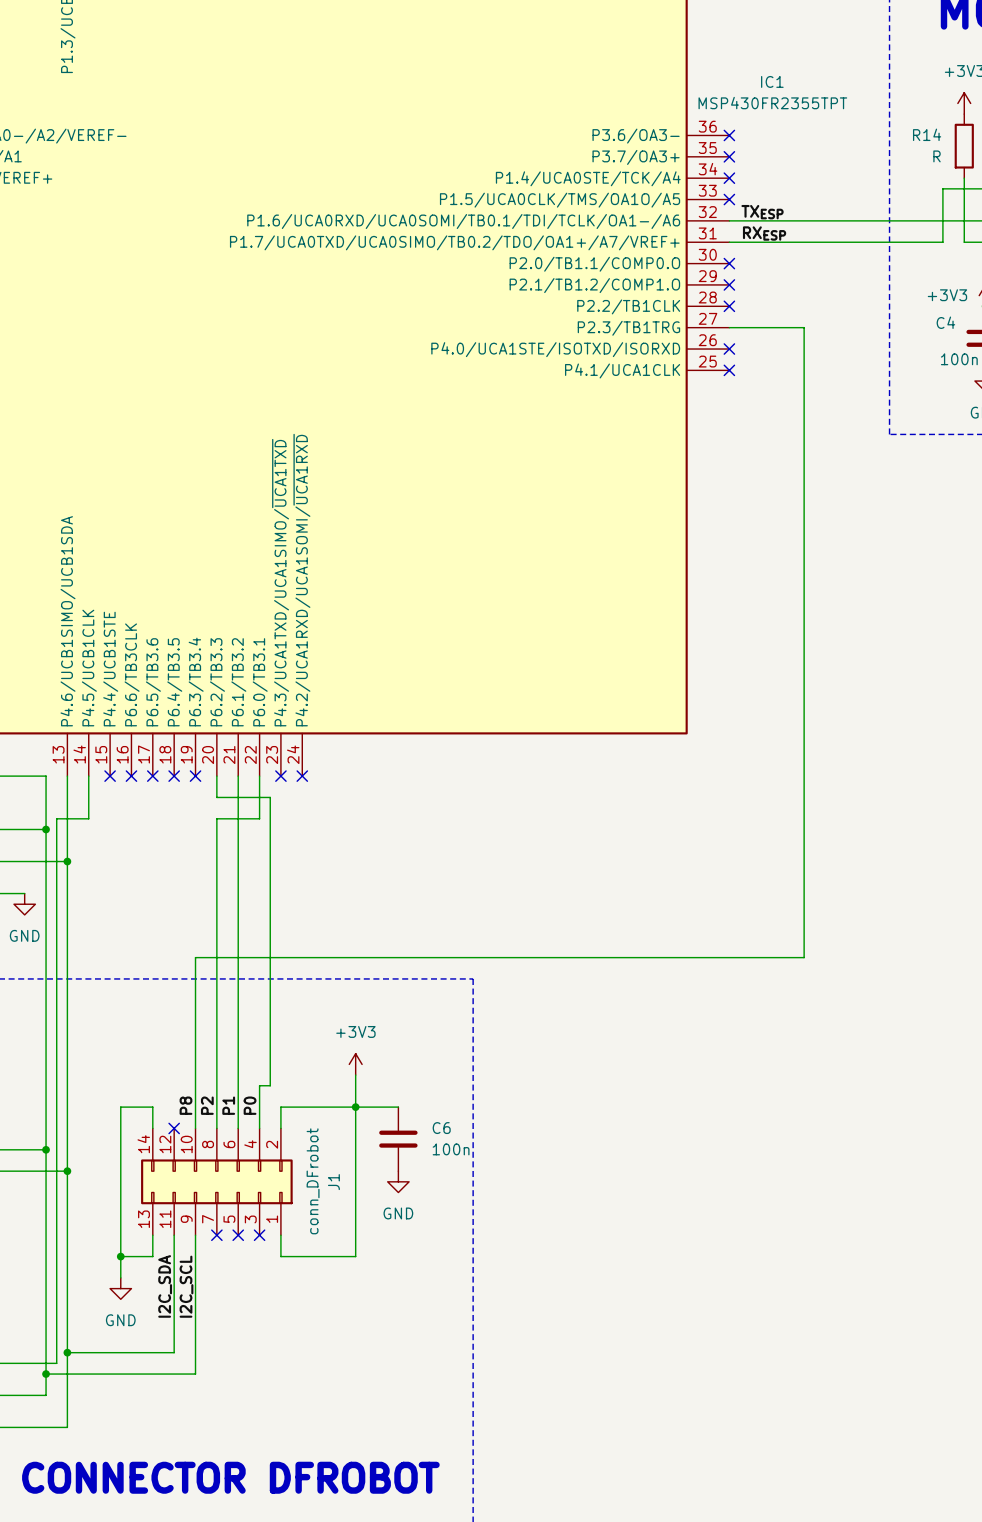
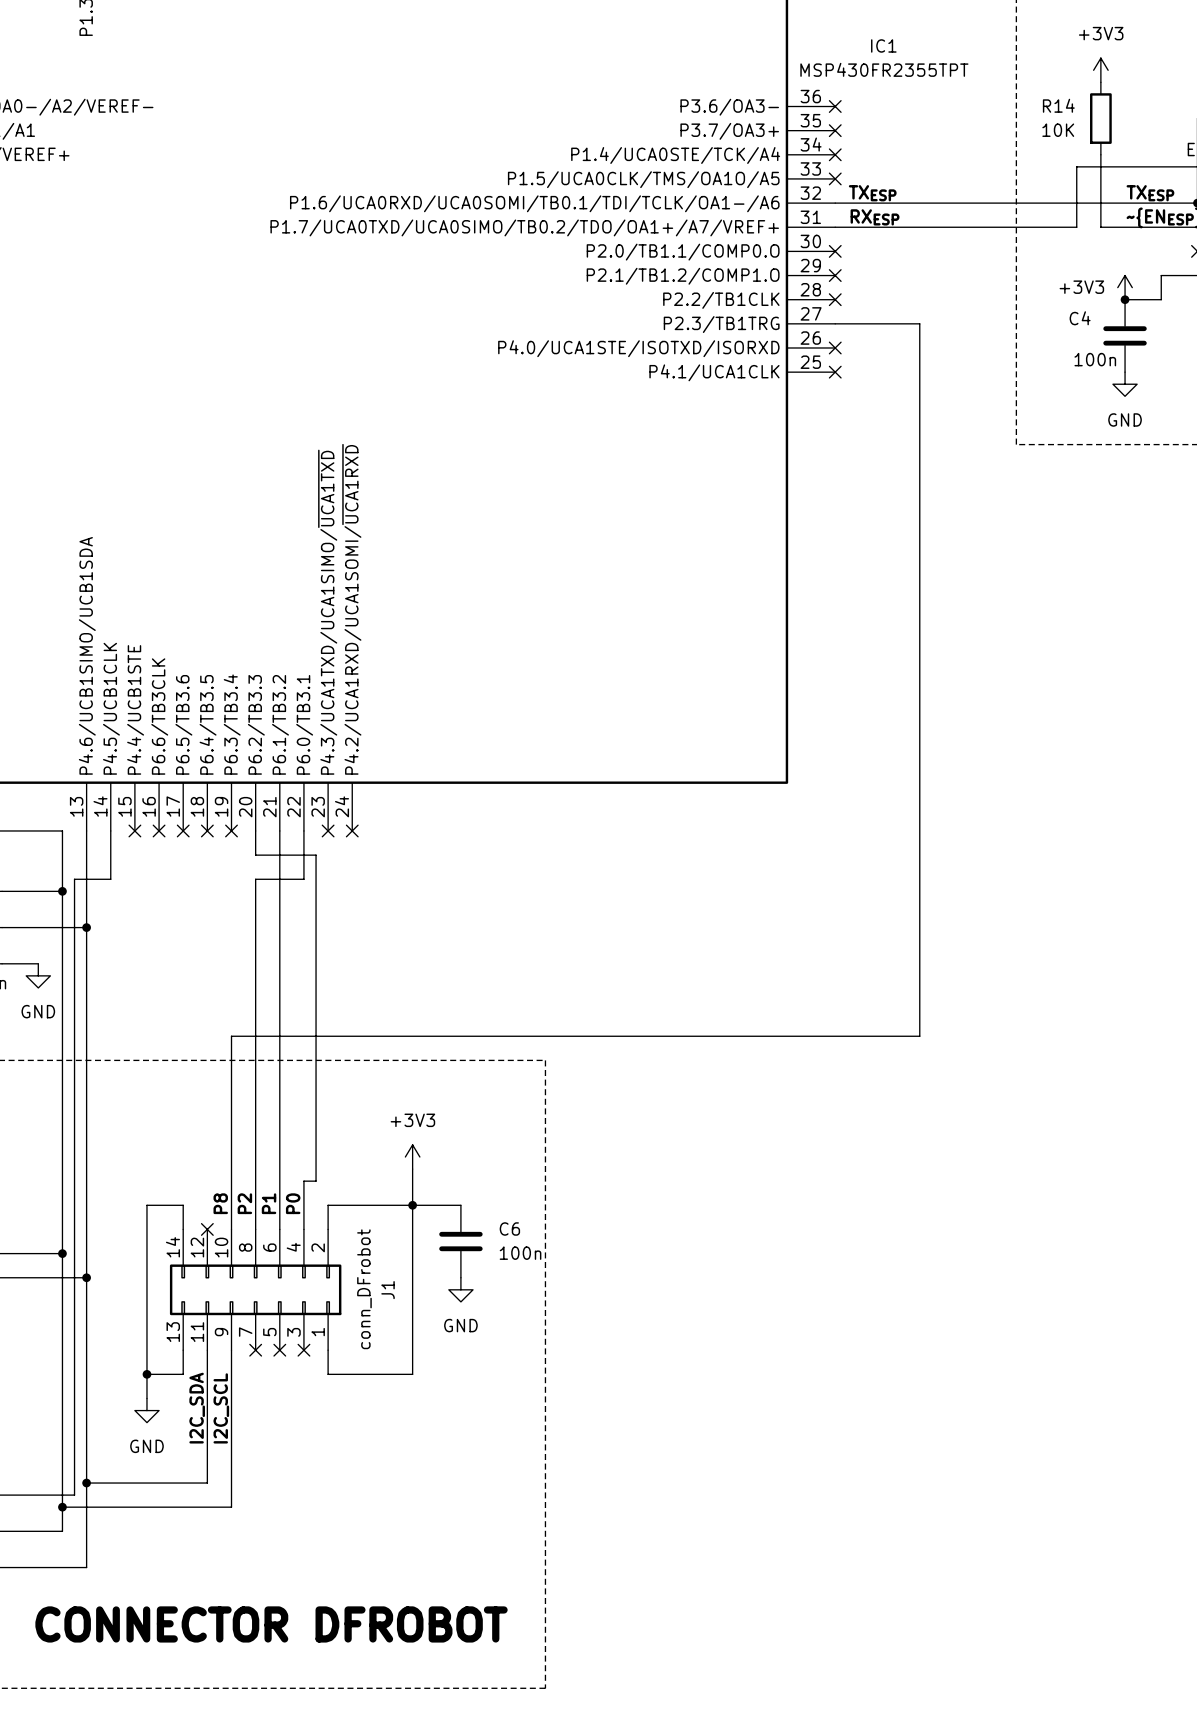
R14 value: R (937, 156) -> 10K (1058, 130)

